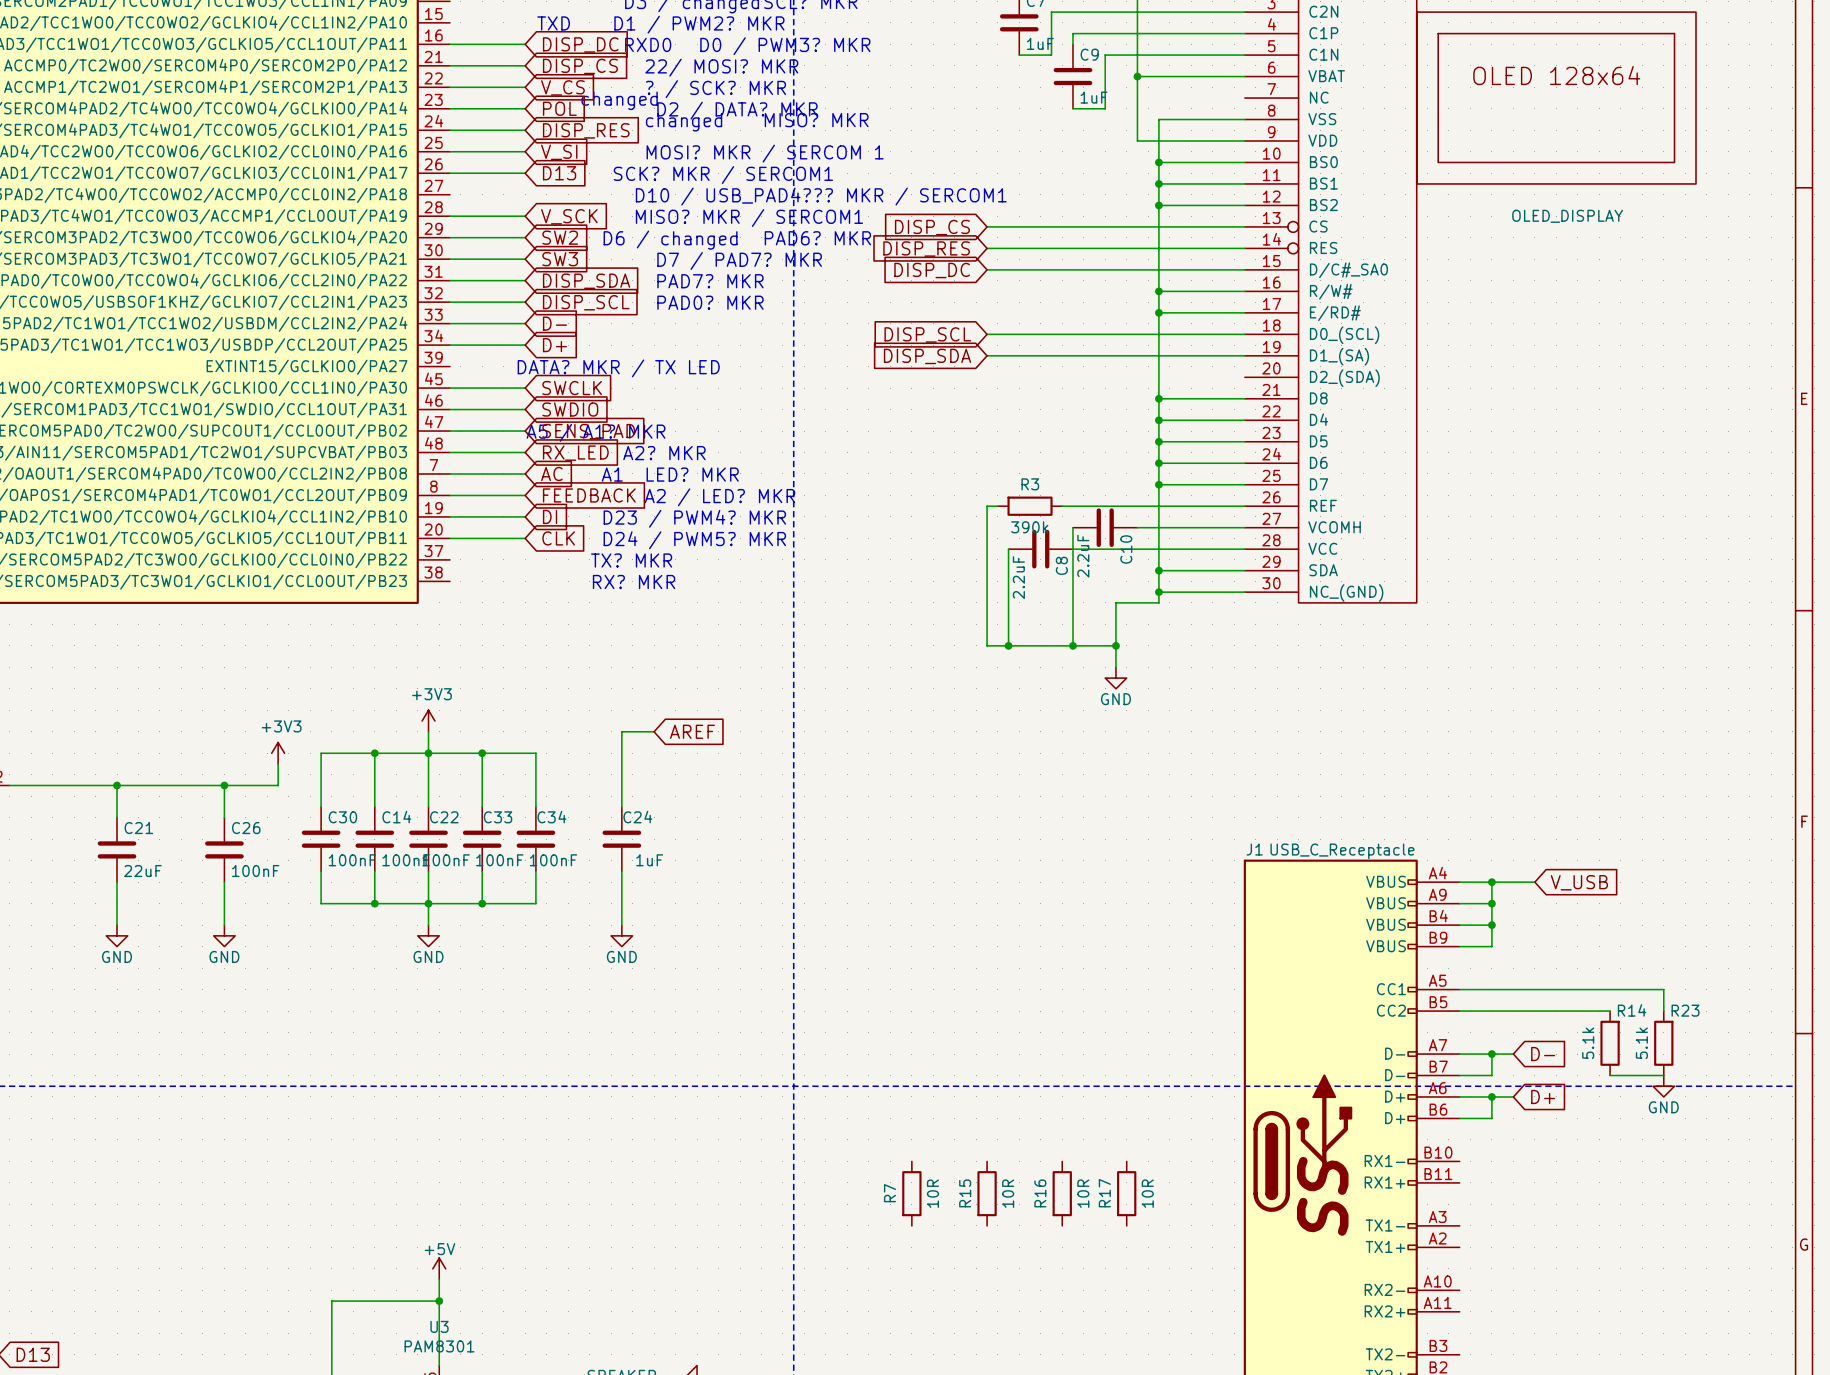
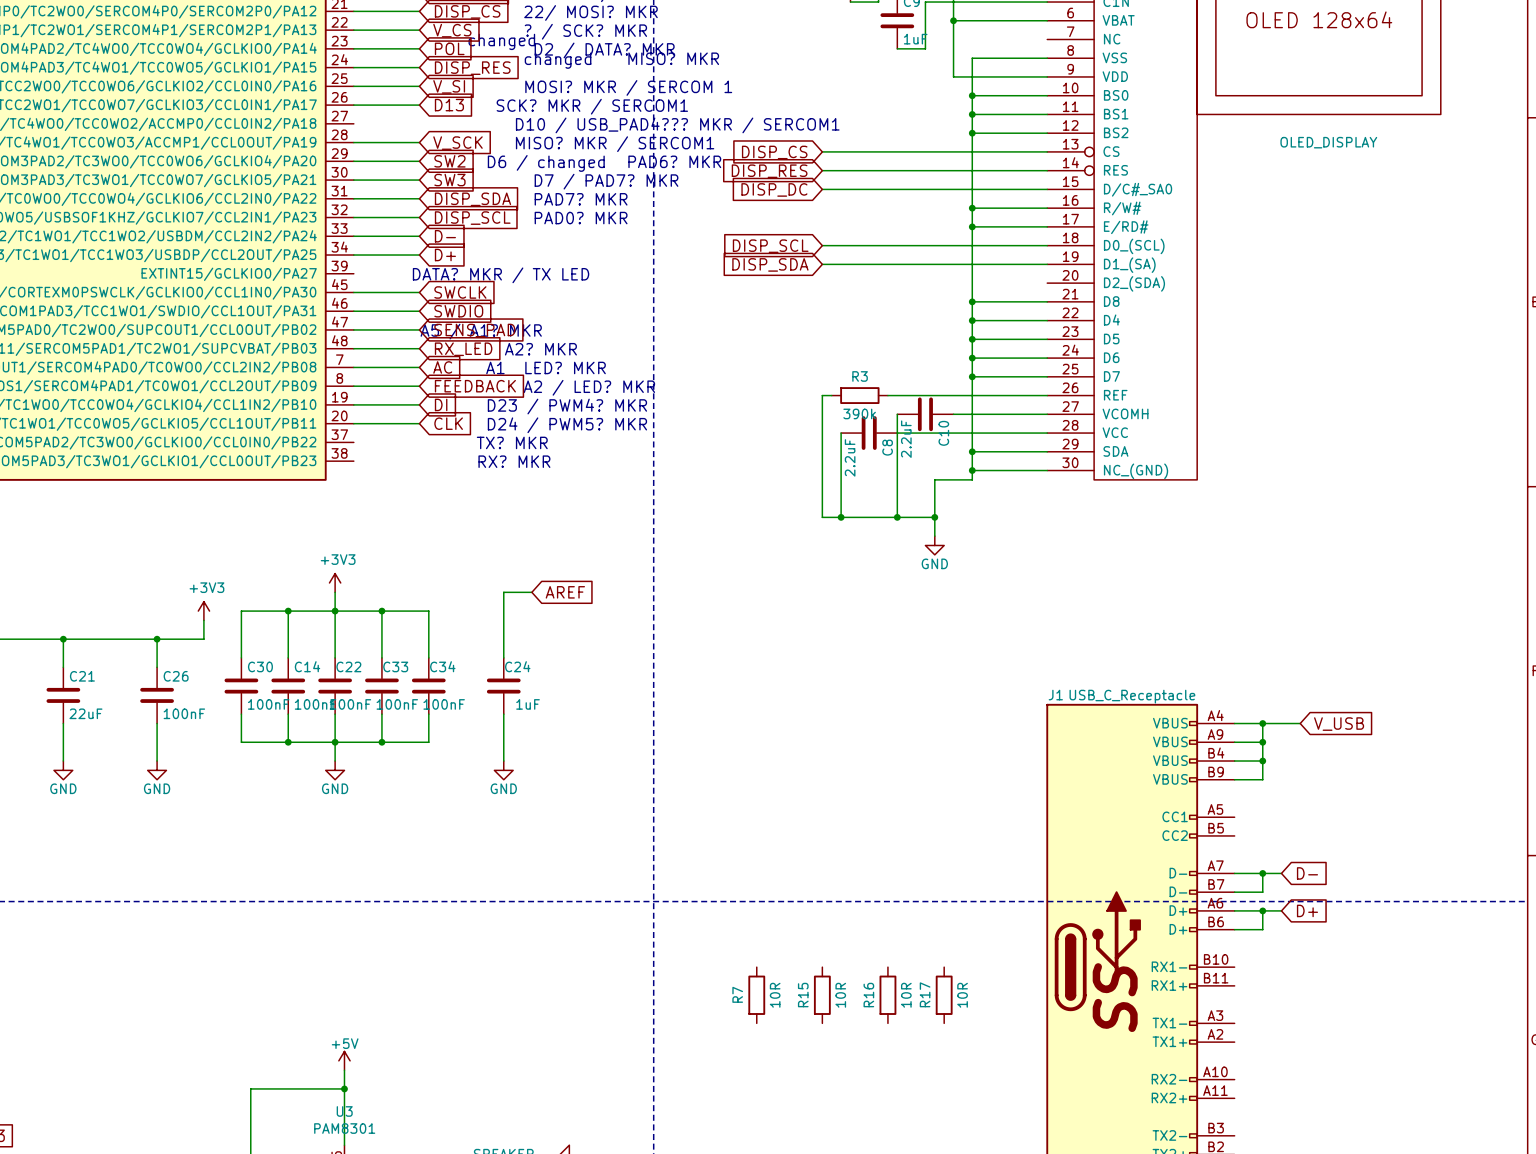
wire: (1459, 989) (1663, 989) (1663, 1011) -> none
wire: (1459, 1011) (1610, 1011) -> none
R14: 5.1k (1610, 1043) -> none
R23: 5.1k (1663, 1043) -> none
wire: (1610, 1075) (1663, 1075) -> none
power symbol: GND (1663, 1086) -> none

